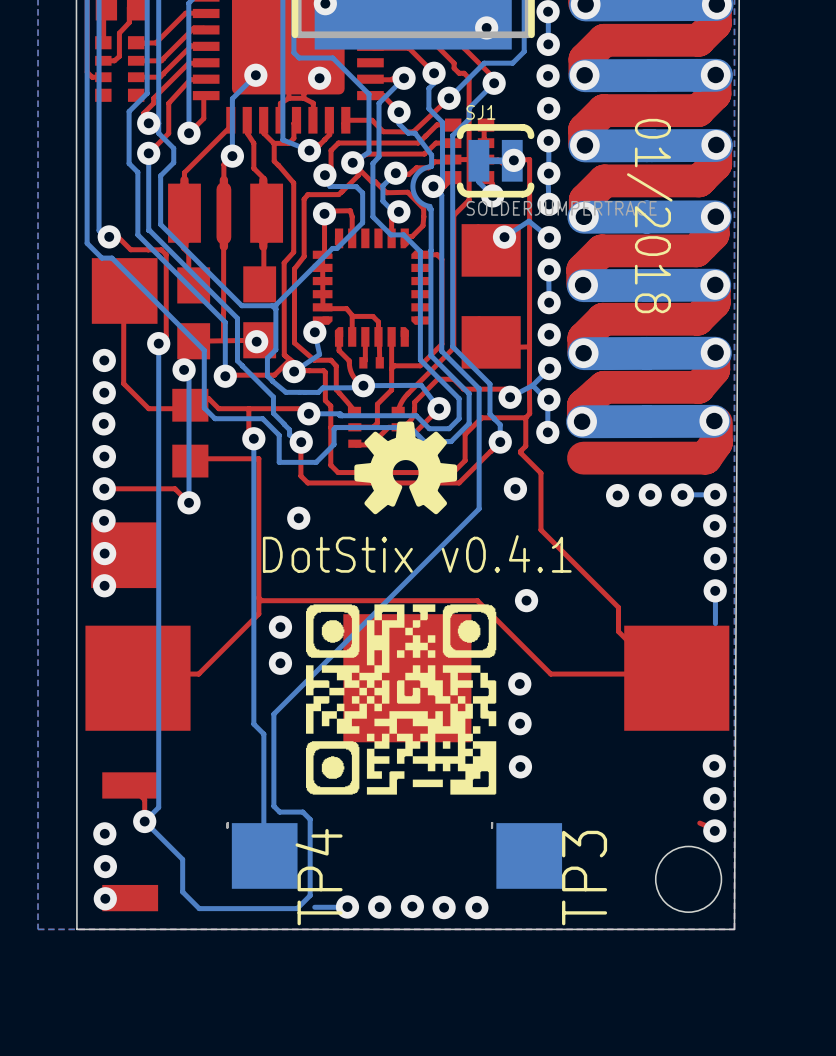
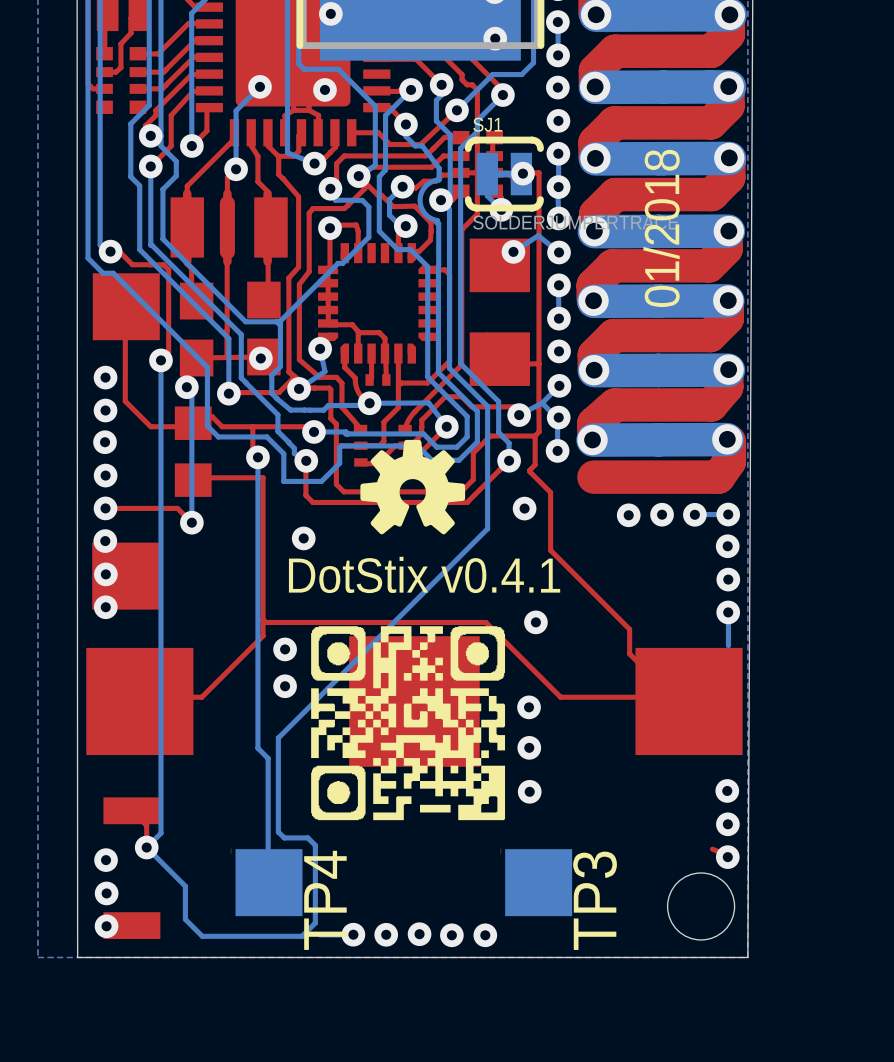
text rotation: 0° (649, 216) -> 180° (661, 228)

